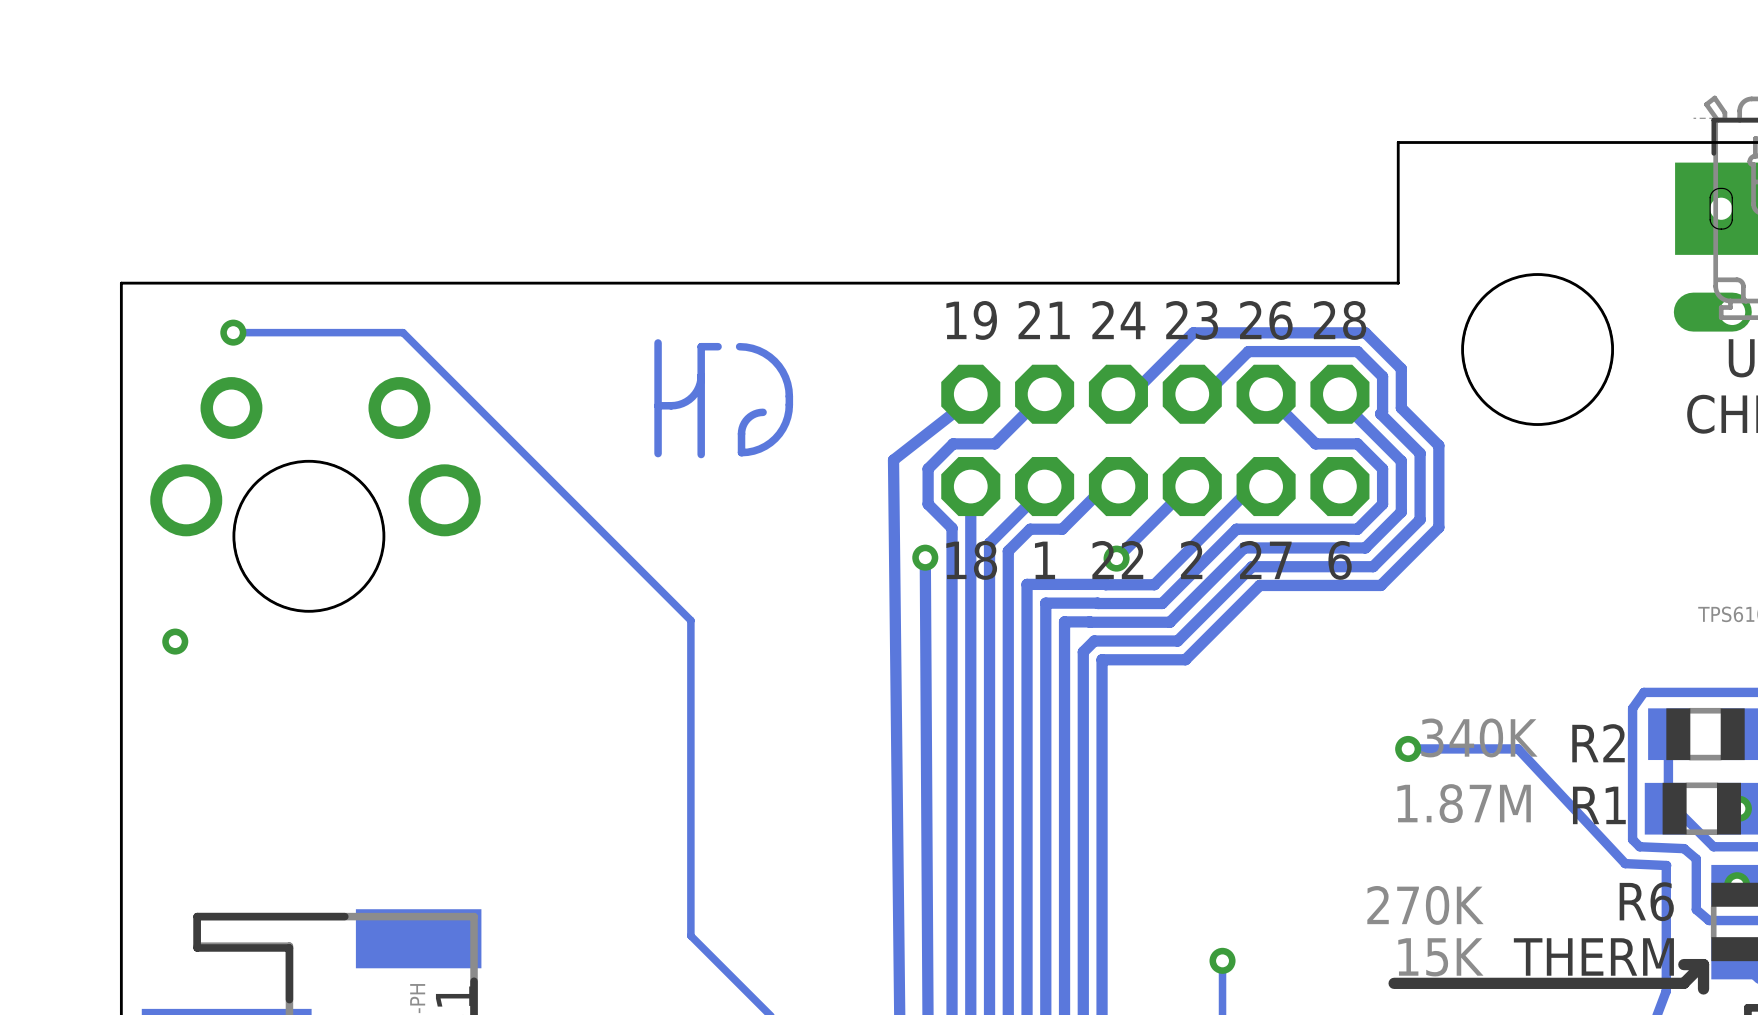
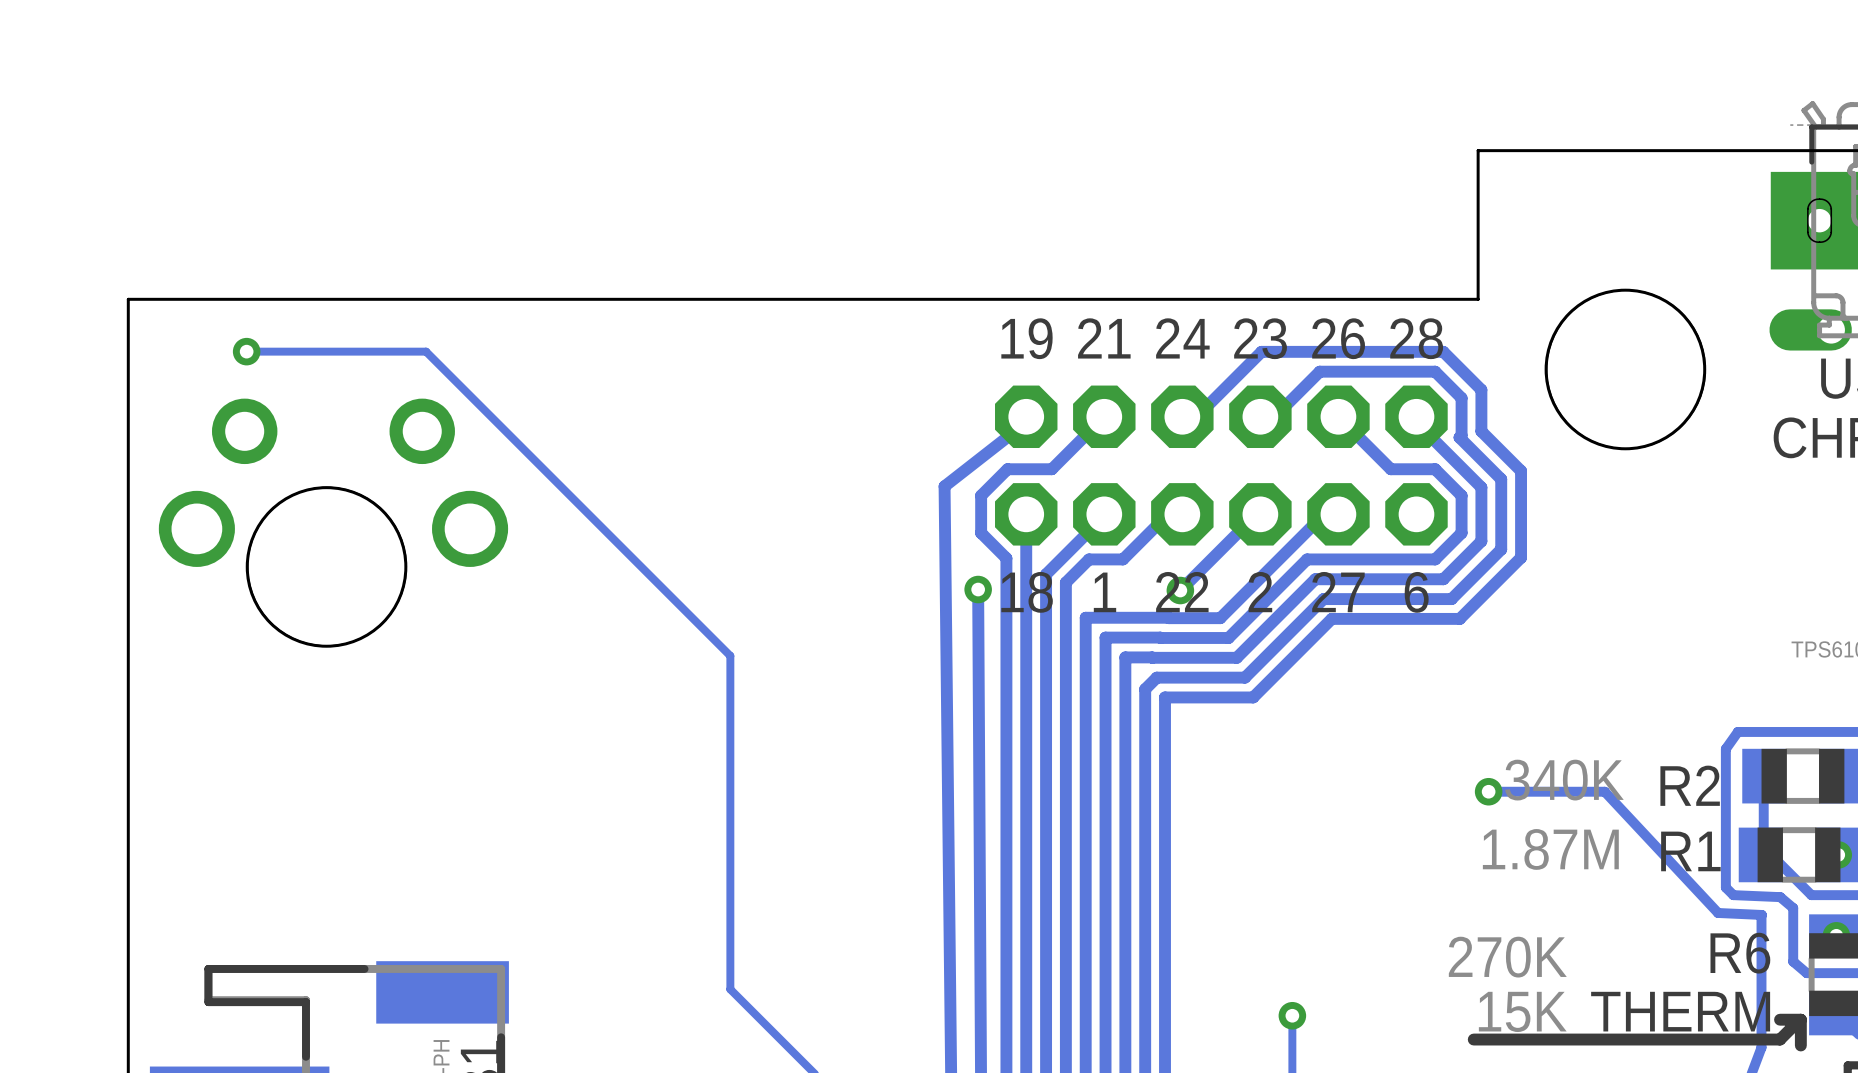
track: (658, 342) (658, 453) -> none
track: (718, 346) (701, 346) (701, 454) -> none
track: (739, 346) (758, 350) (774, 361) (785, 377) (789, 396) (787, 417) (779, 433) (765, 446) (753, 451) (741, 452) (741, 431) (744, 423) (752, 415) (763, 412) -> none
track: (701, 375) (697, 390) (689, 399) (675, 405) (658, 405) -> none
via: (175, 641) -> none

